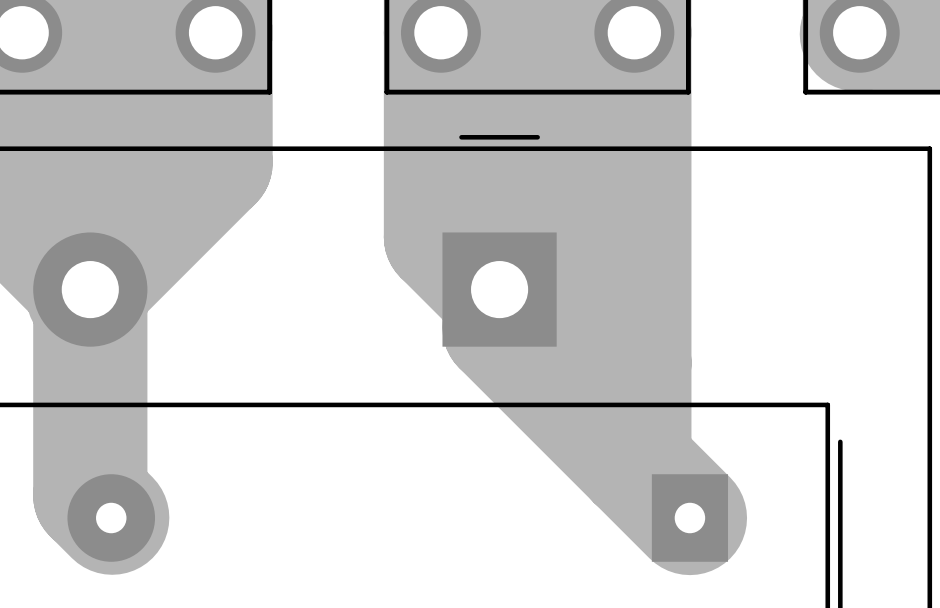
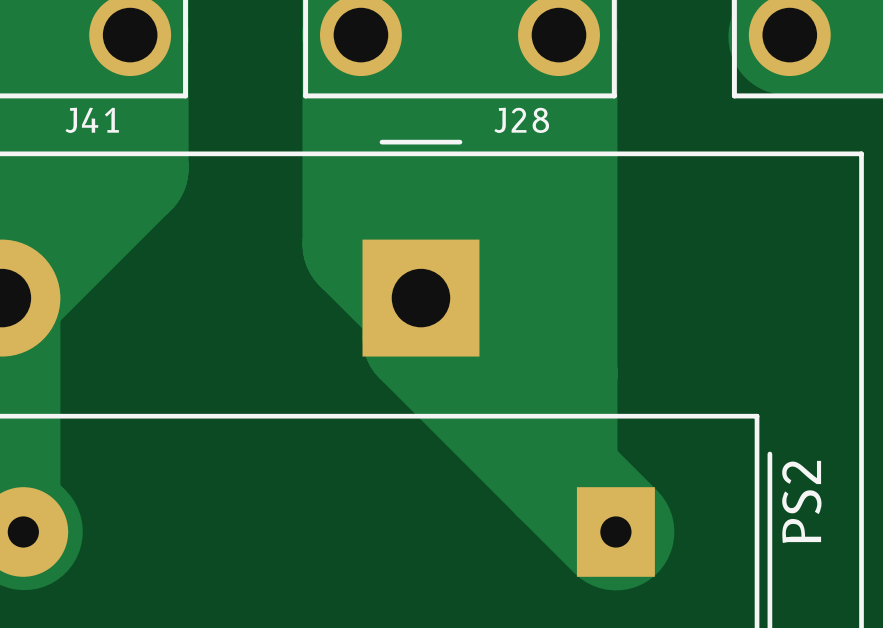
J41 name: none -> J41 (92, 120)
J28 name: none -> J28 (521, 120)
PS2 name: none -> PS2 (801, 501)

